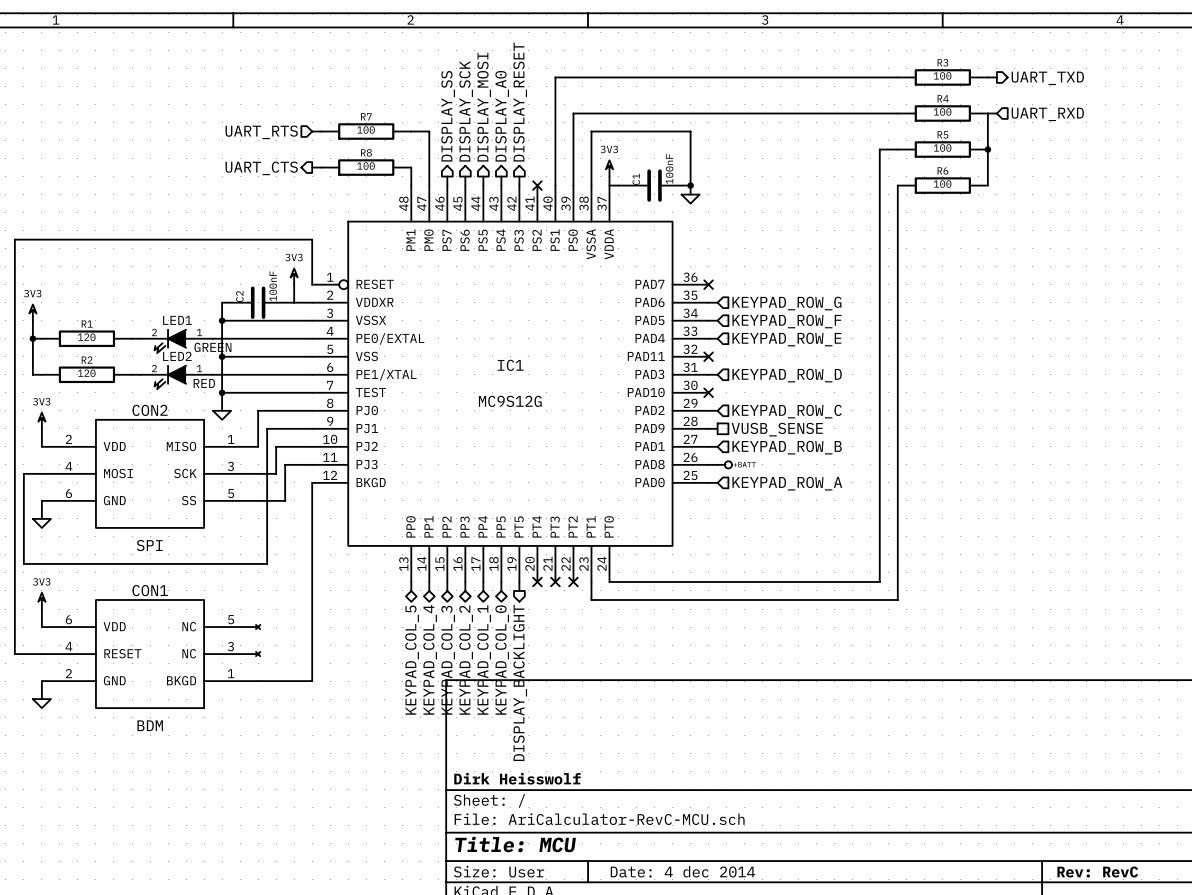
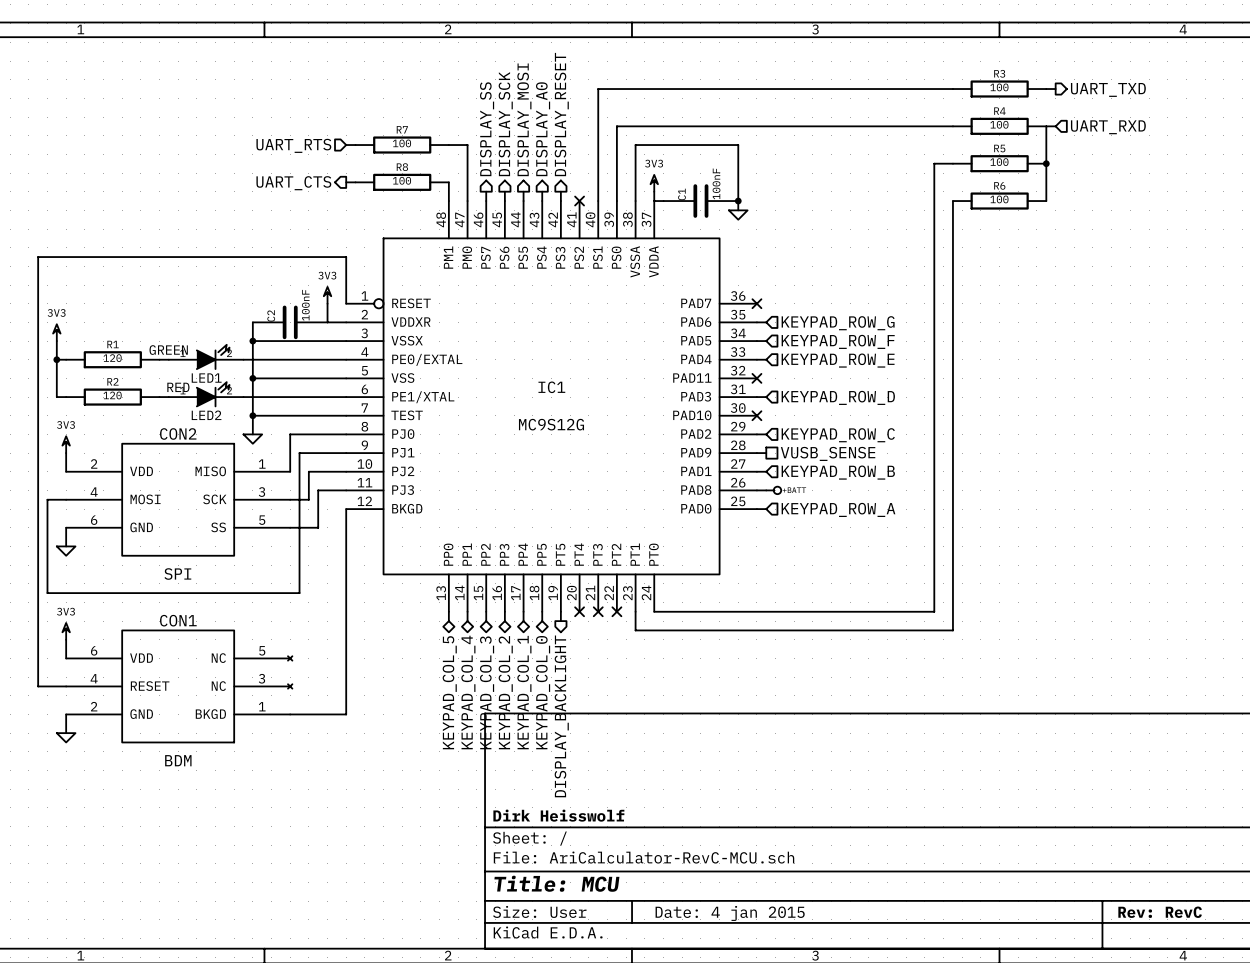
LED1 rotation: 0° (170, 341) -> 180° (213, 356)
LED2 rotation: 0° (170, 377) -> 180° (213, 394)
title block: Date: 4 dec 2014 (682, 871) -> Date: 4 jan 2015 (730, 913)

